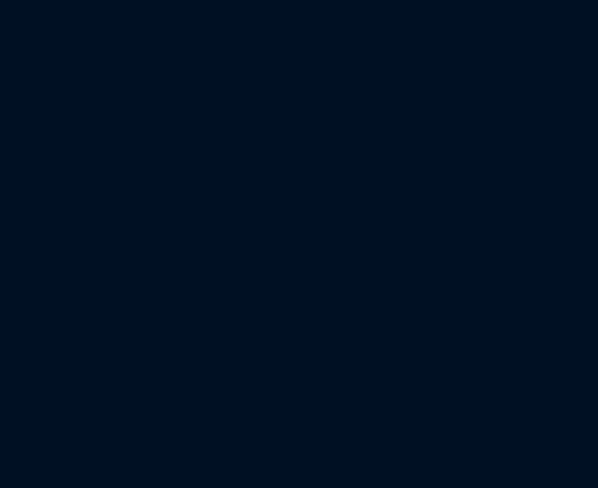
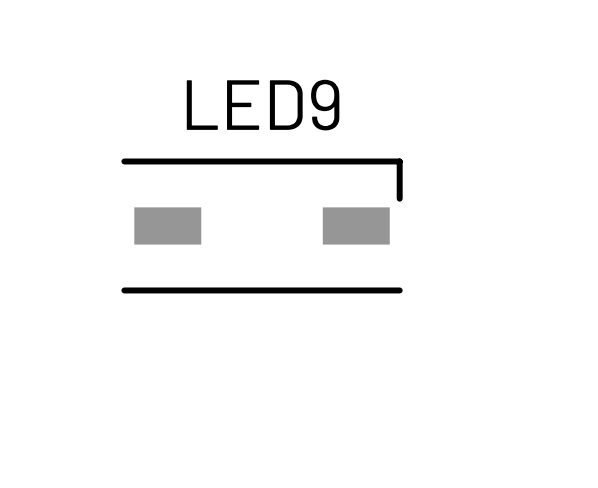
LED9: none -> (262, 225)

